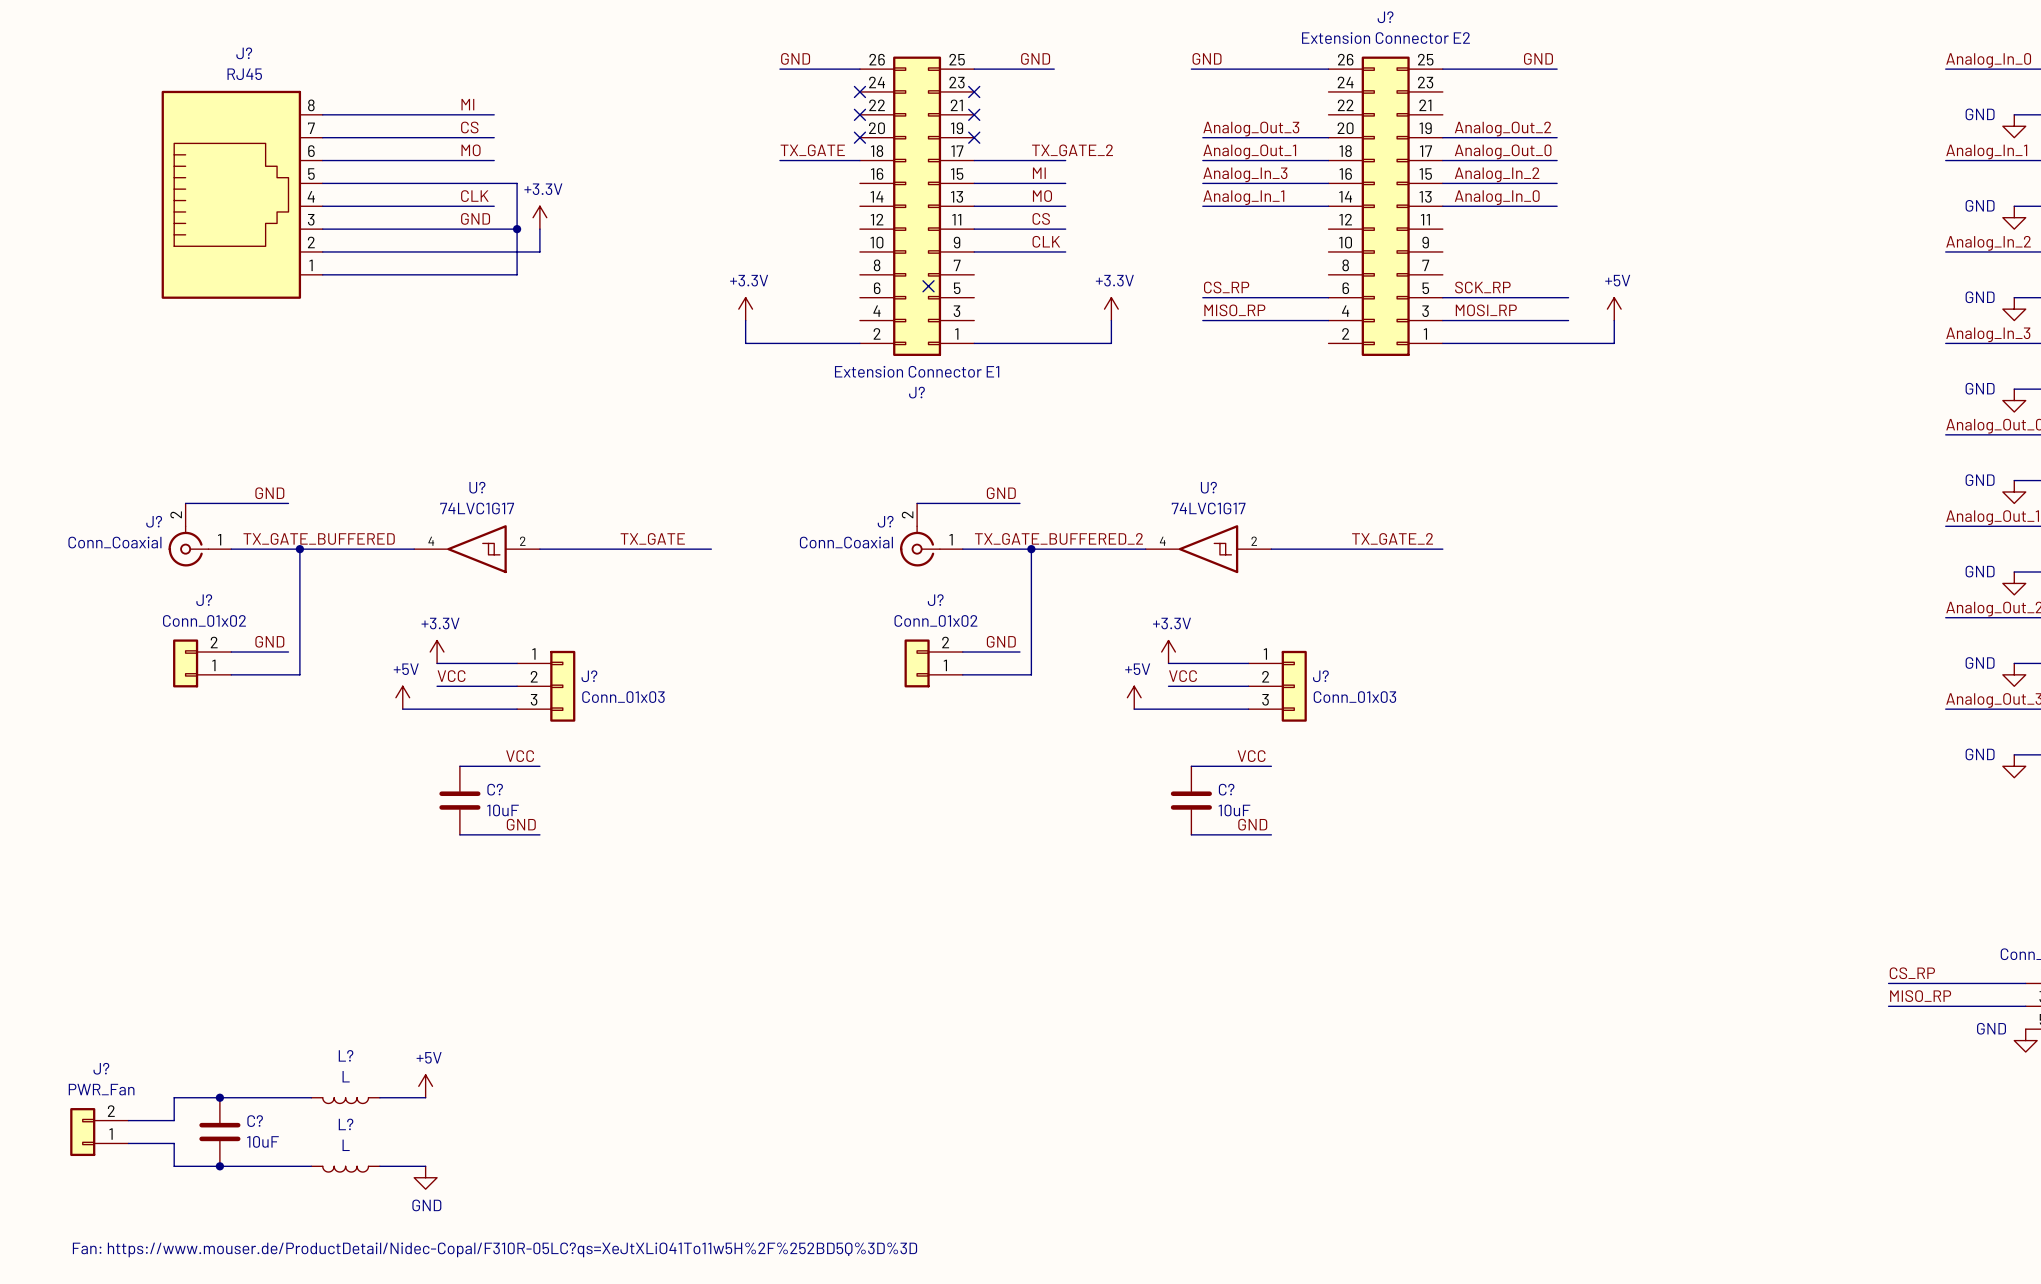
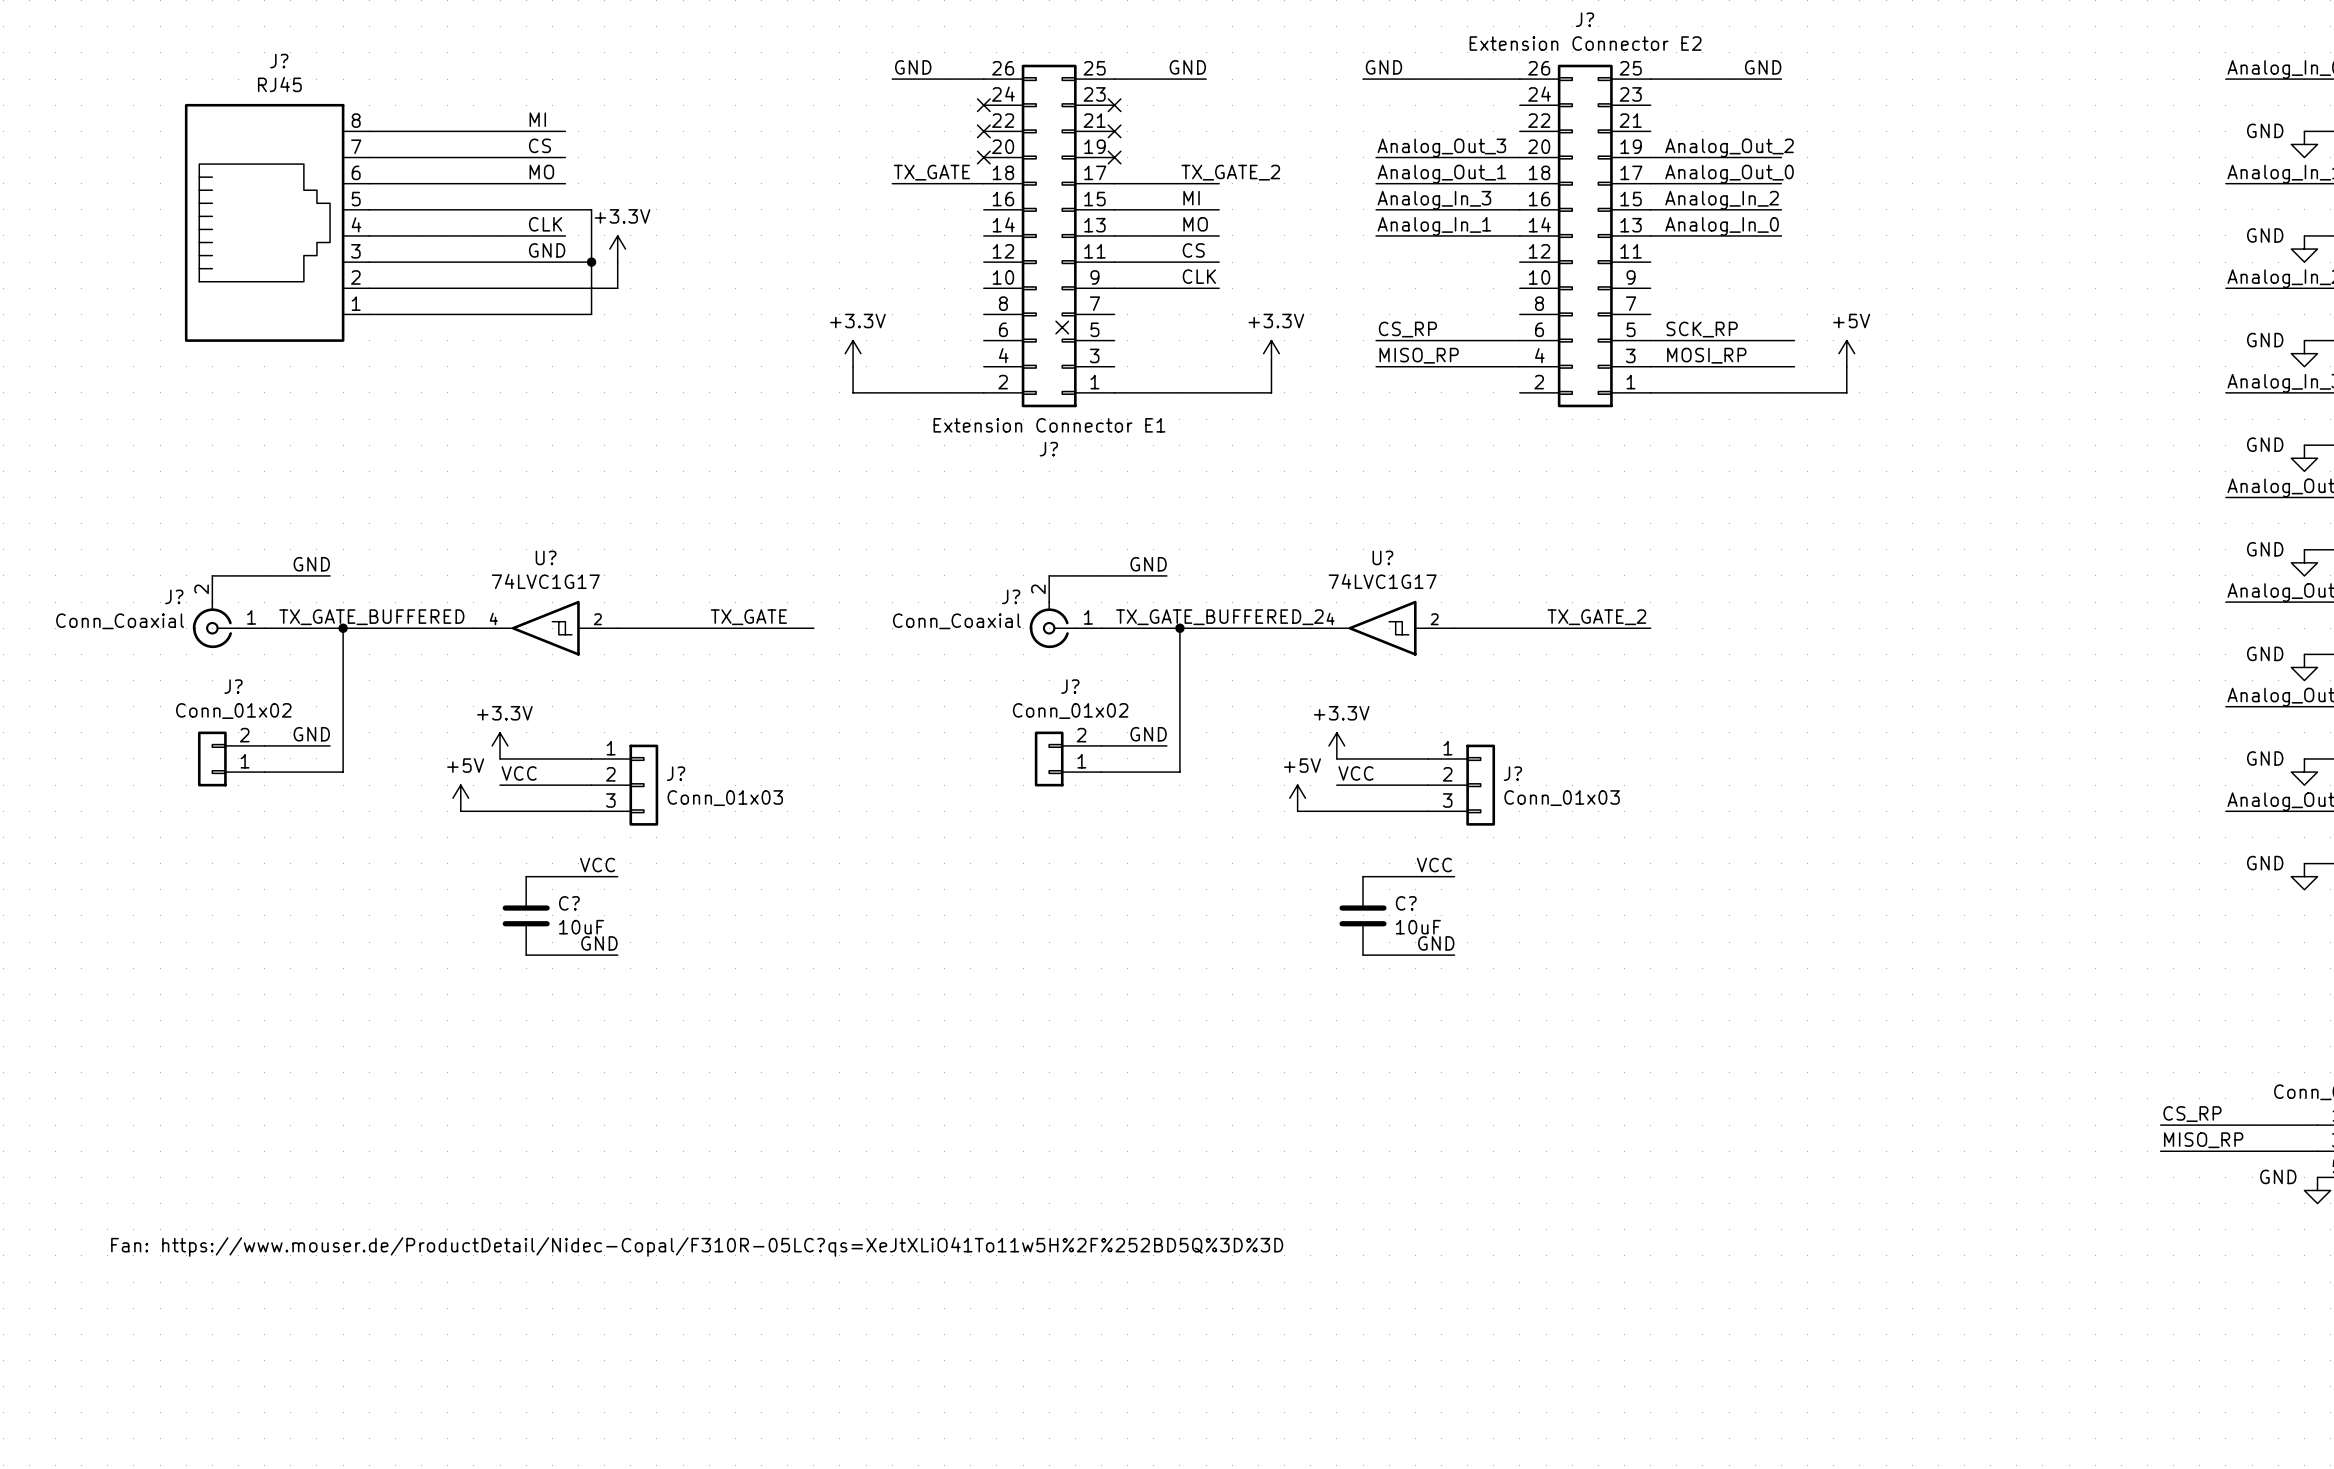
power symbol: +5V (425, 1086) -> none
junction: (219, 1097) -> none
wire: (311, 1097) (174, 1097) (174, 1120) (128, 1120) -> none
wire: (379, 1097) (425, 1097) -> none
L?: L (345, 1100) -> none
J?: PWR_Fan (99, 1132) -> none
C?: 10uF (219, 1132) -> none
wire: (128, 1143) (174, 1143) (174, 1166) (311, 1166) -> none
junction: (219, 1166) -> none
wire: (379, 1166) (425, 1166) -> none
L?: L (345, 1169) -> none
power symbol: GND (425, 1177) -> none
text position: Fan: https://www.mouser.de/ProductDetail/Nidec-Copal/F310R-05LC?qs=XeJtXLiO41To11w5H%2F%252BD5Q%3D%3D (494, 1249) -> Fan: https://www.mouser.de/ProductDetail/Nidec-Copal/F310R-05LC?qs=XeJtXLiO41To11w5H%2F%252BD5Q%3D%3D (697, 1247)

